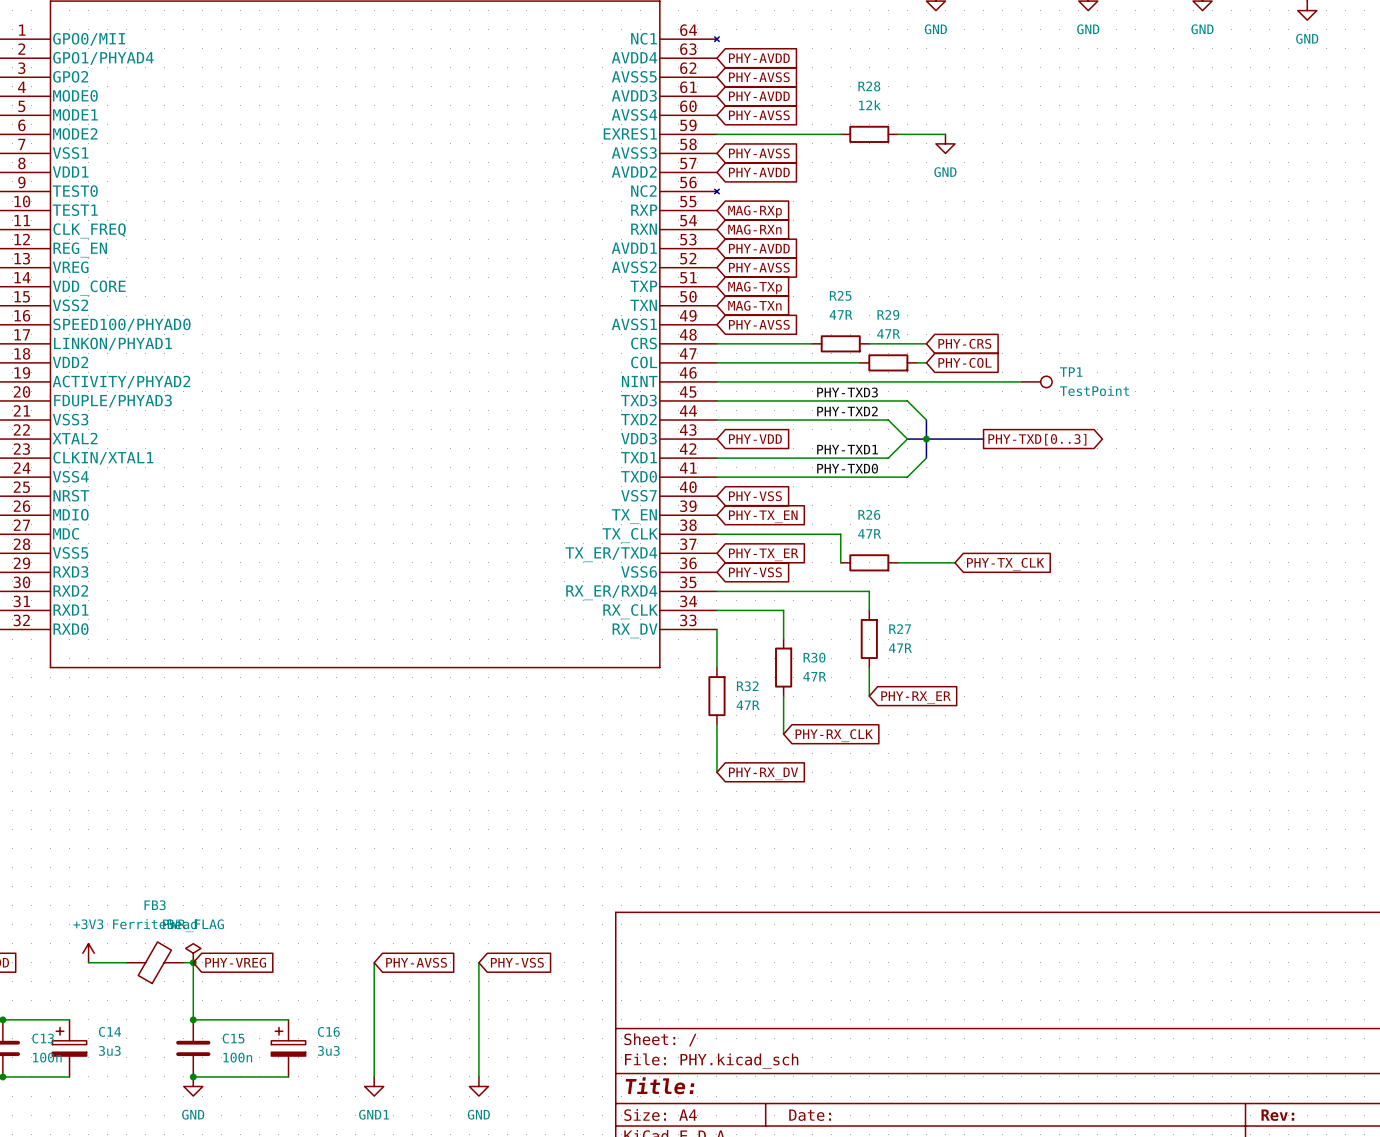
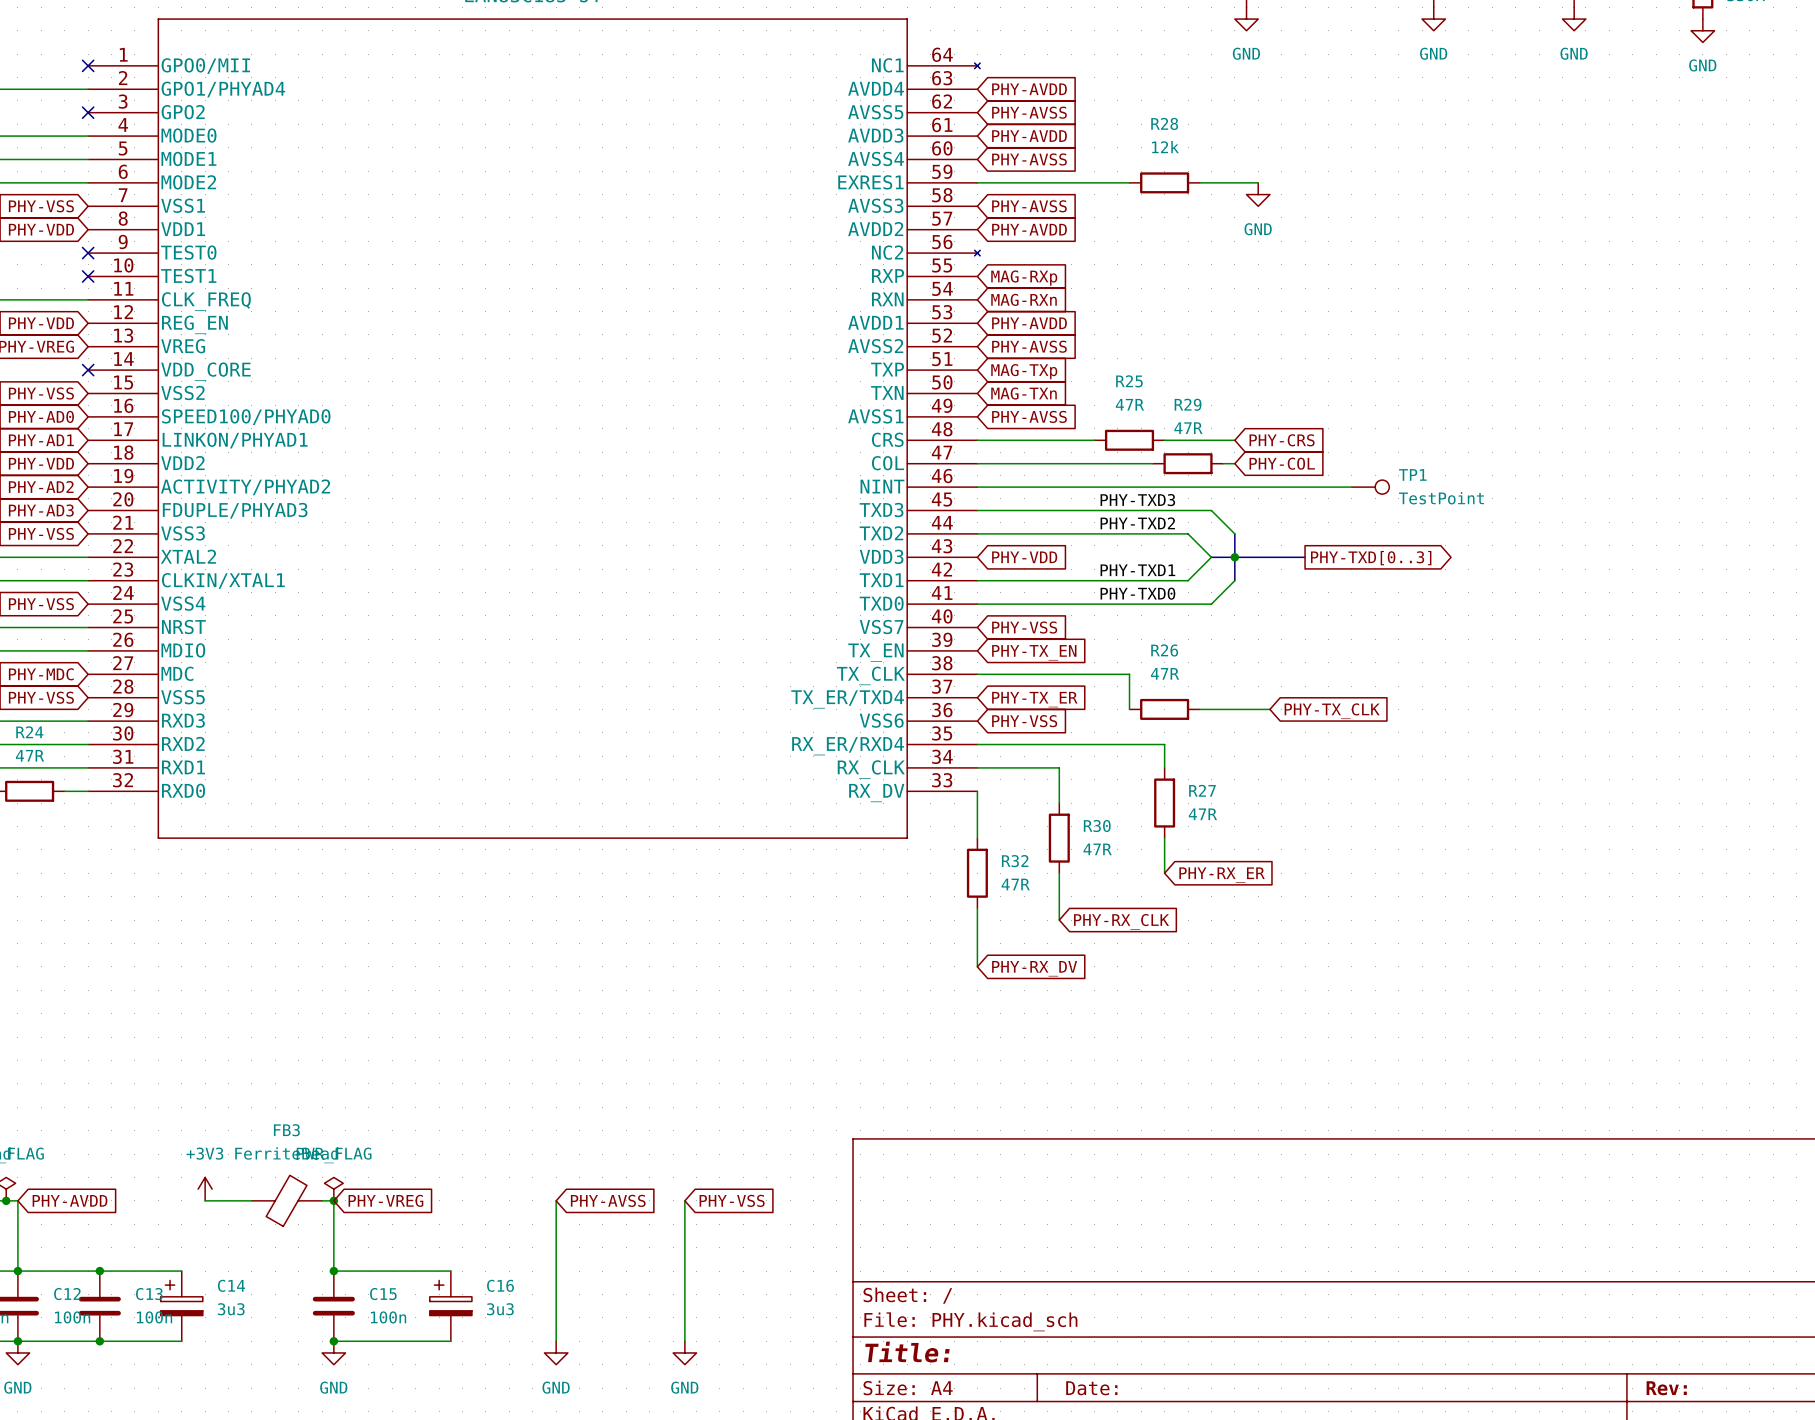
power symbol: GND1 (374, 1086) -> GND (556, 1352)

